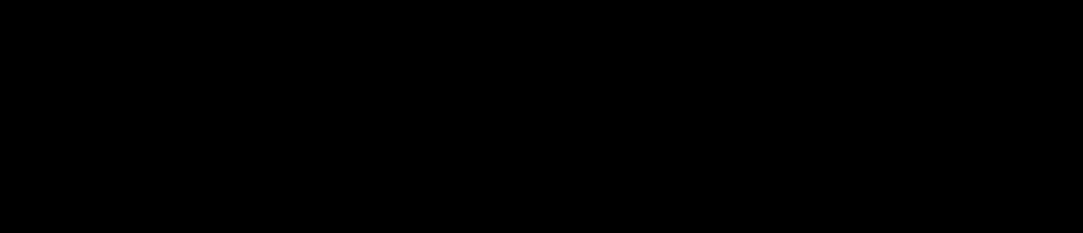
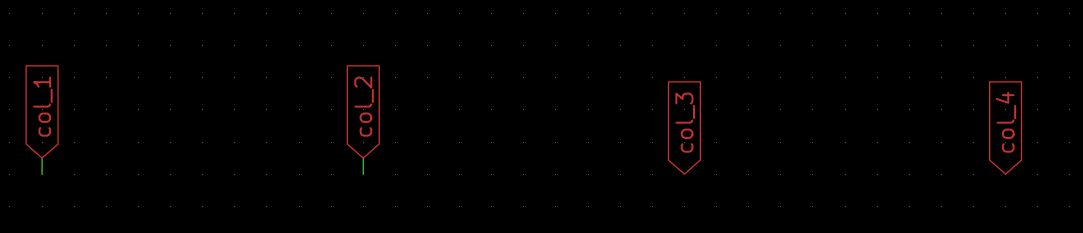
global label: none -> col_1 (42, 106)
global label: none -> col_2 (364, 106)
global label: none -> col_3 (685, 122)
global label: none -> col_4 (1005, 122)
wire: none -> (42, 158) (42, 174)
wire: none -> (363, 158) (363, 174)

